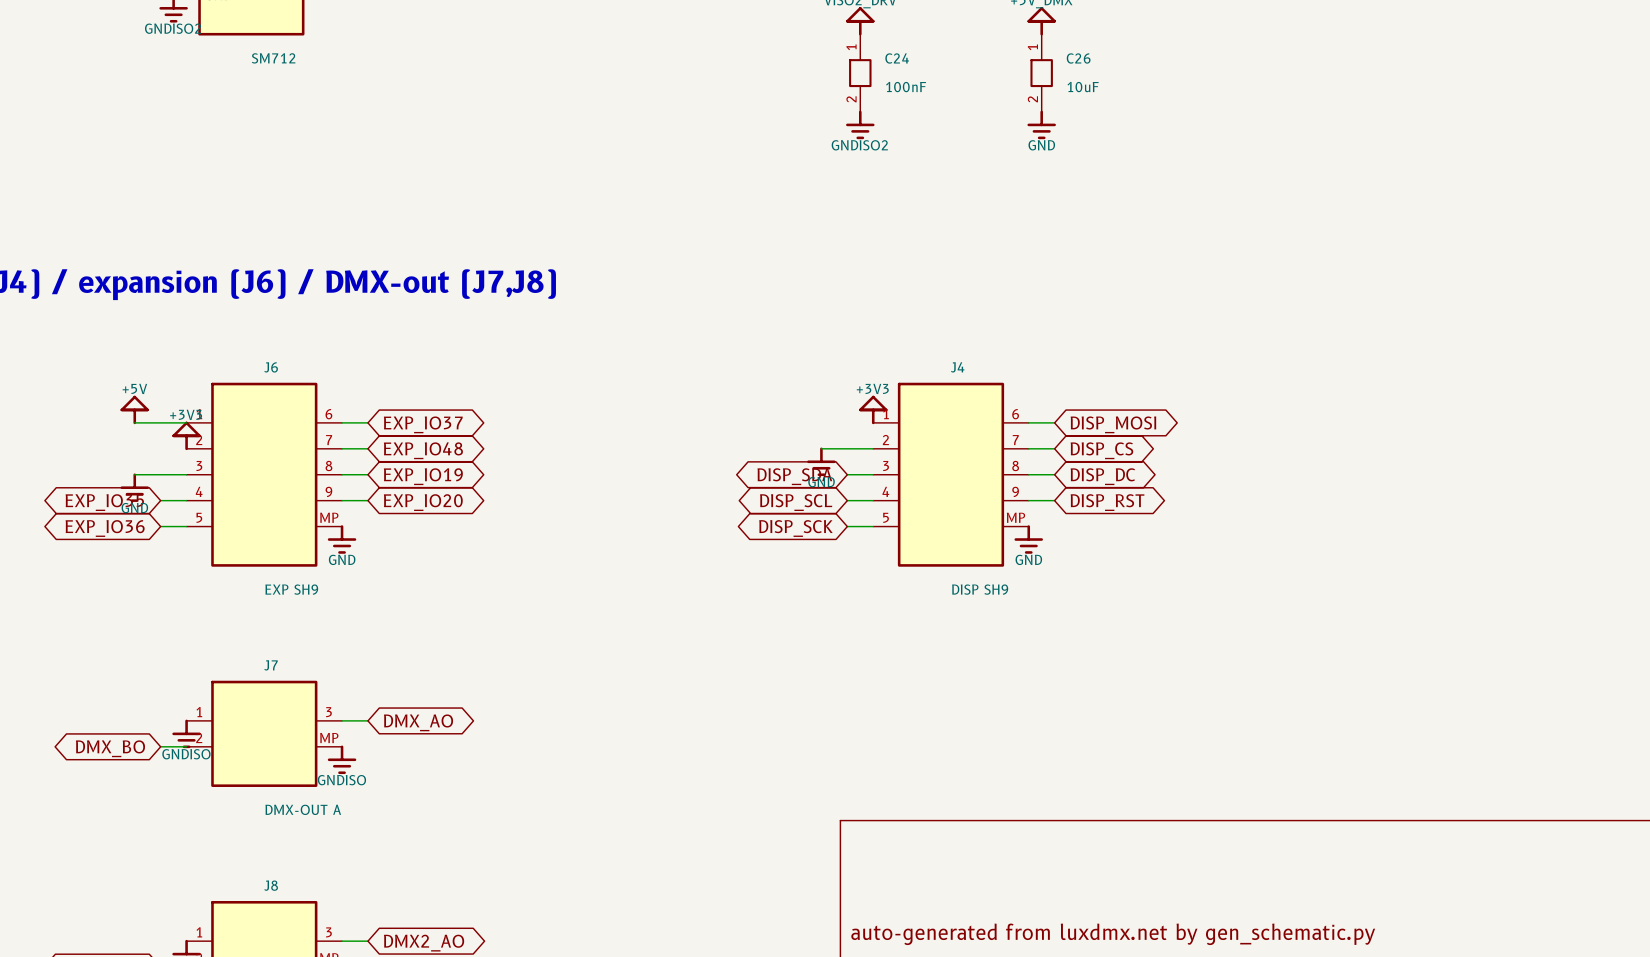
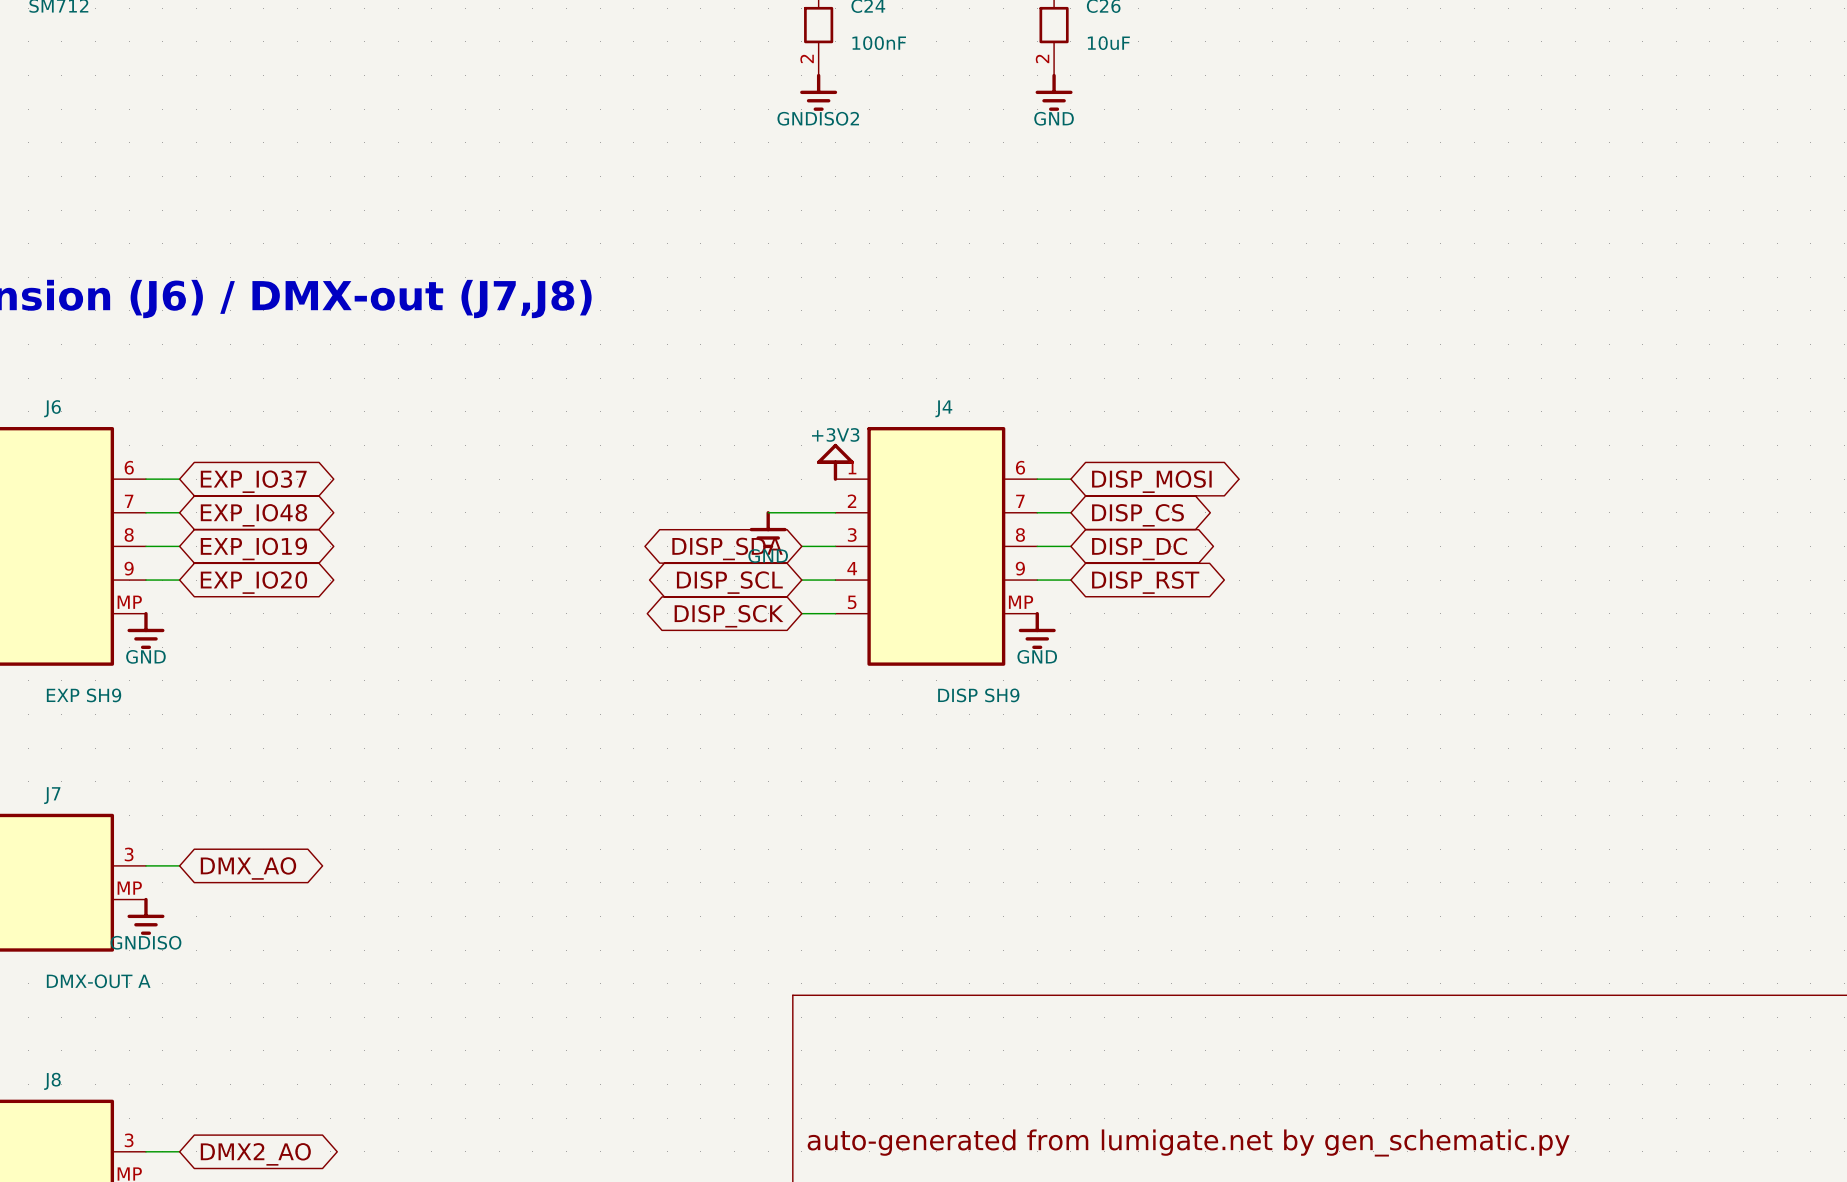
title block: auto-generated from luxdmx.net by gen_schematic.py (1113, 934) -> auto-generated from lumigate.net by gen_schematic.py (1188, 1142)

